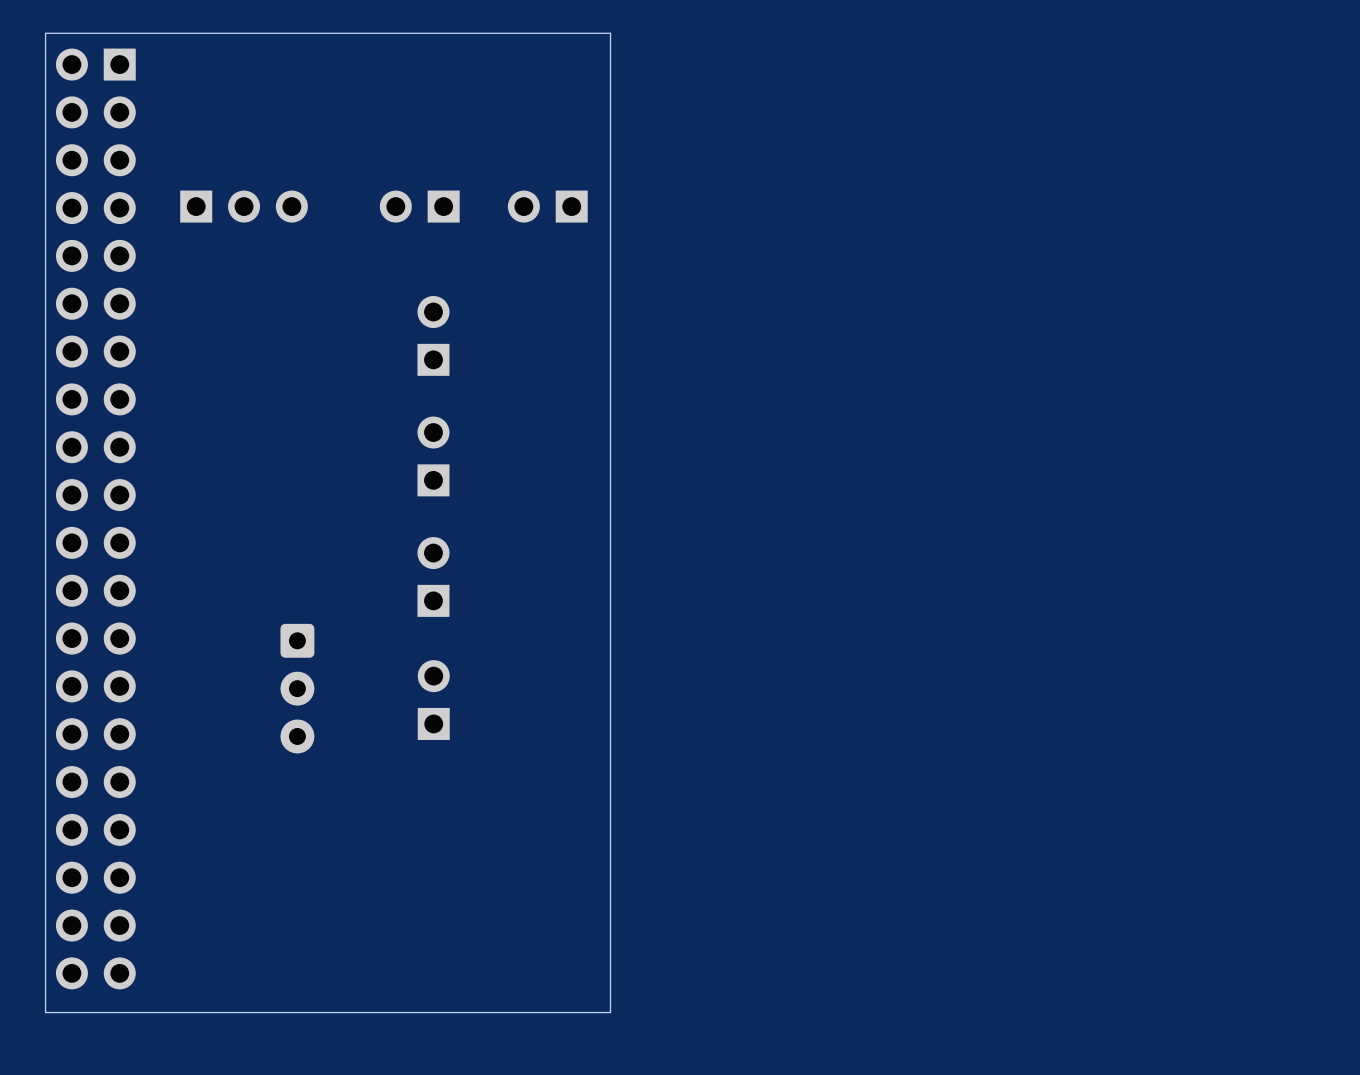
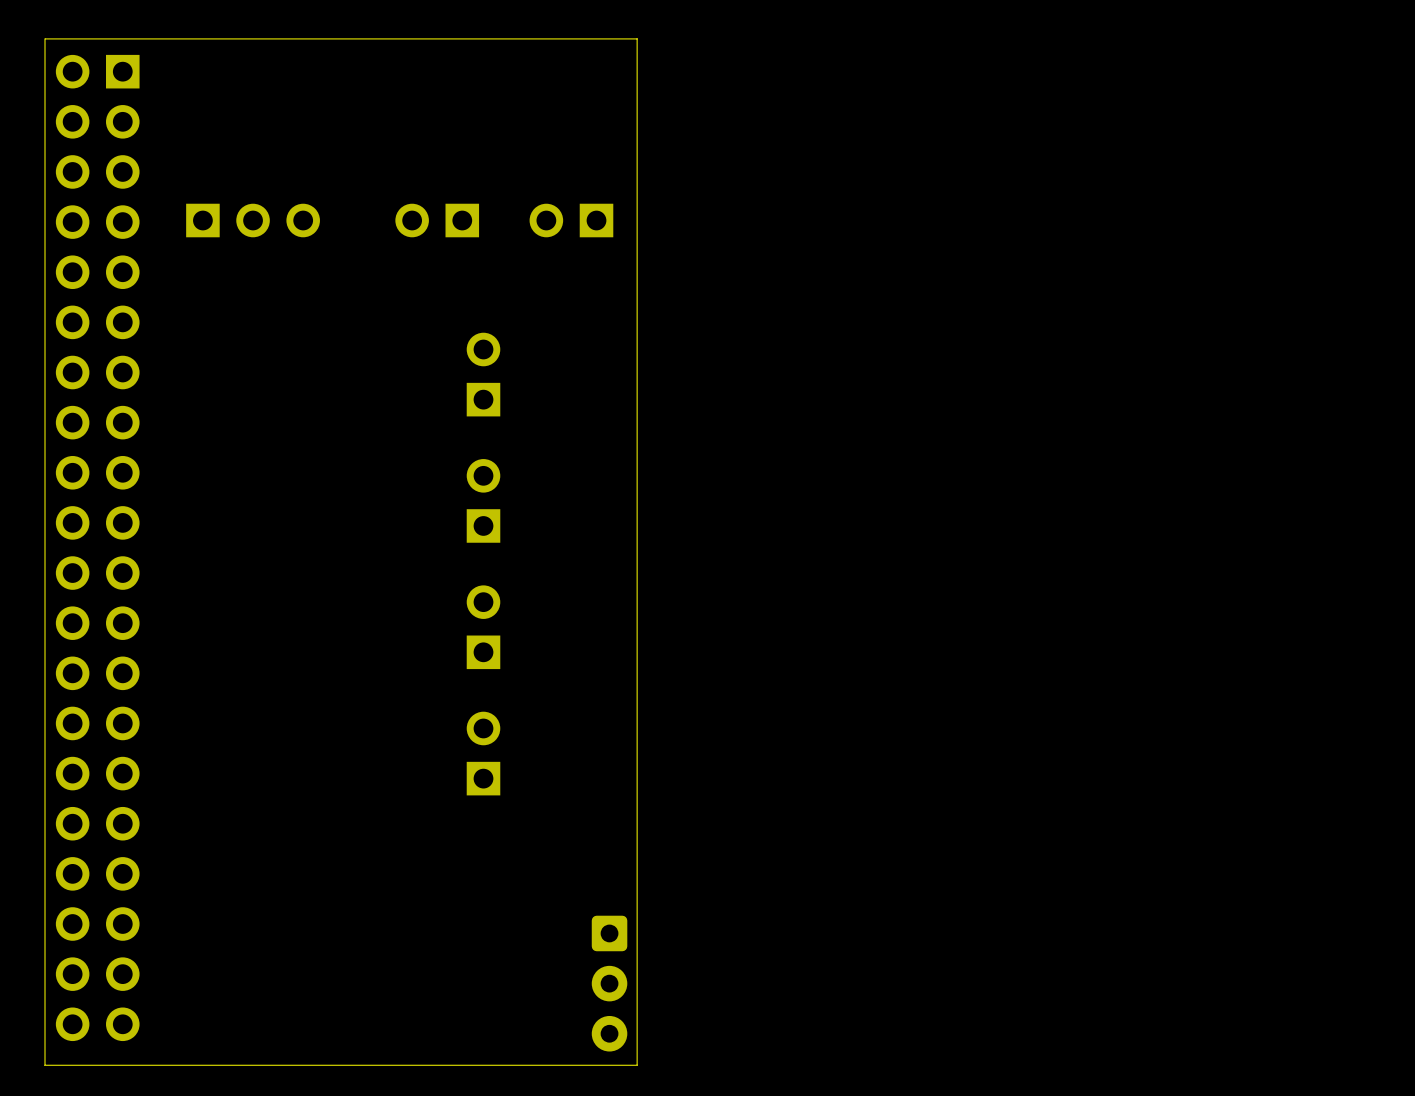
part position: (433, 335) -> (483, 374)
part position: (433, 456) -> (483, 500)
part position: (433, 576) -> (483, 627)
part position: (297, 688) -> (609, 983)
part position: (433, 700) -> (483, 753)

